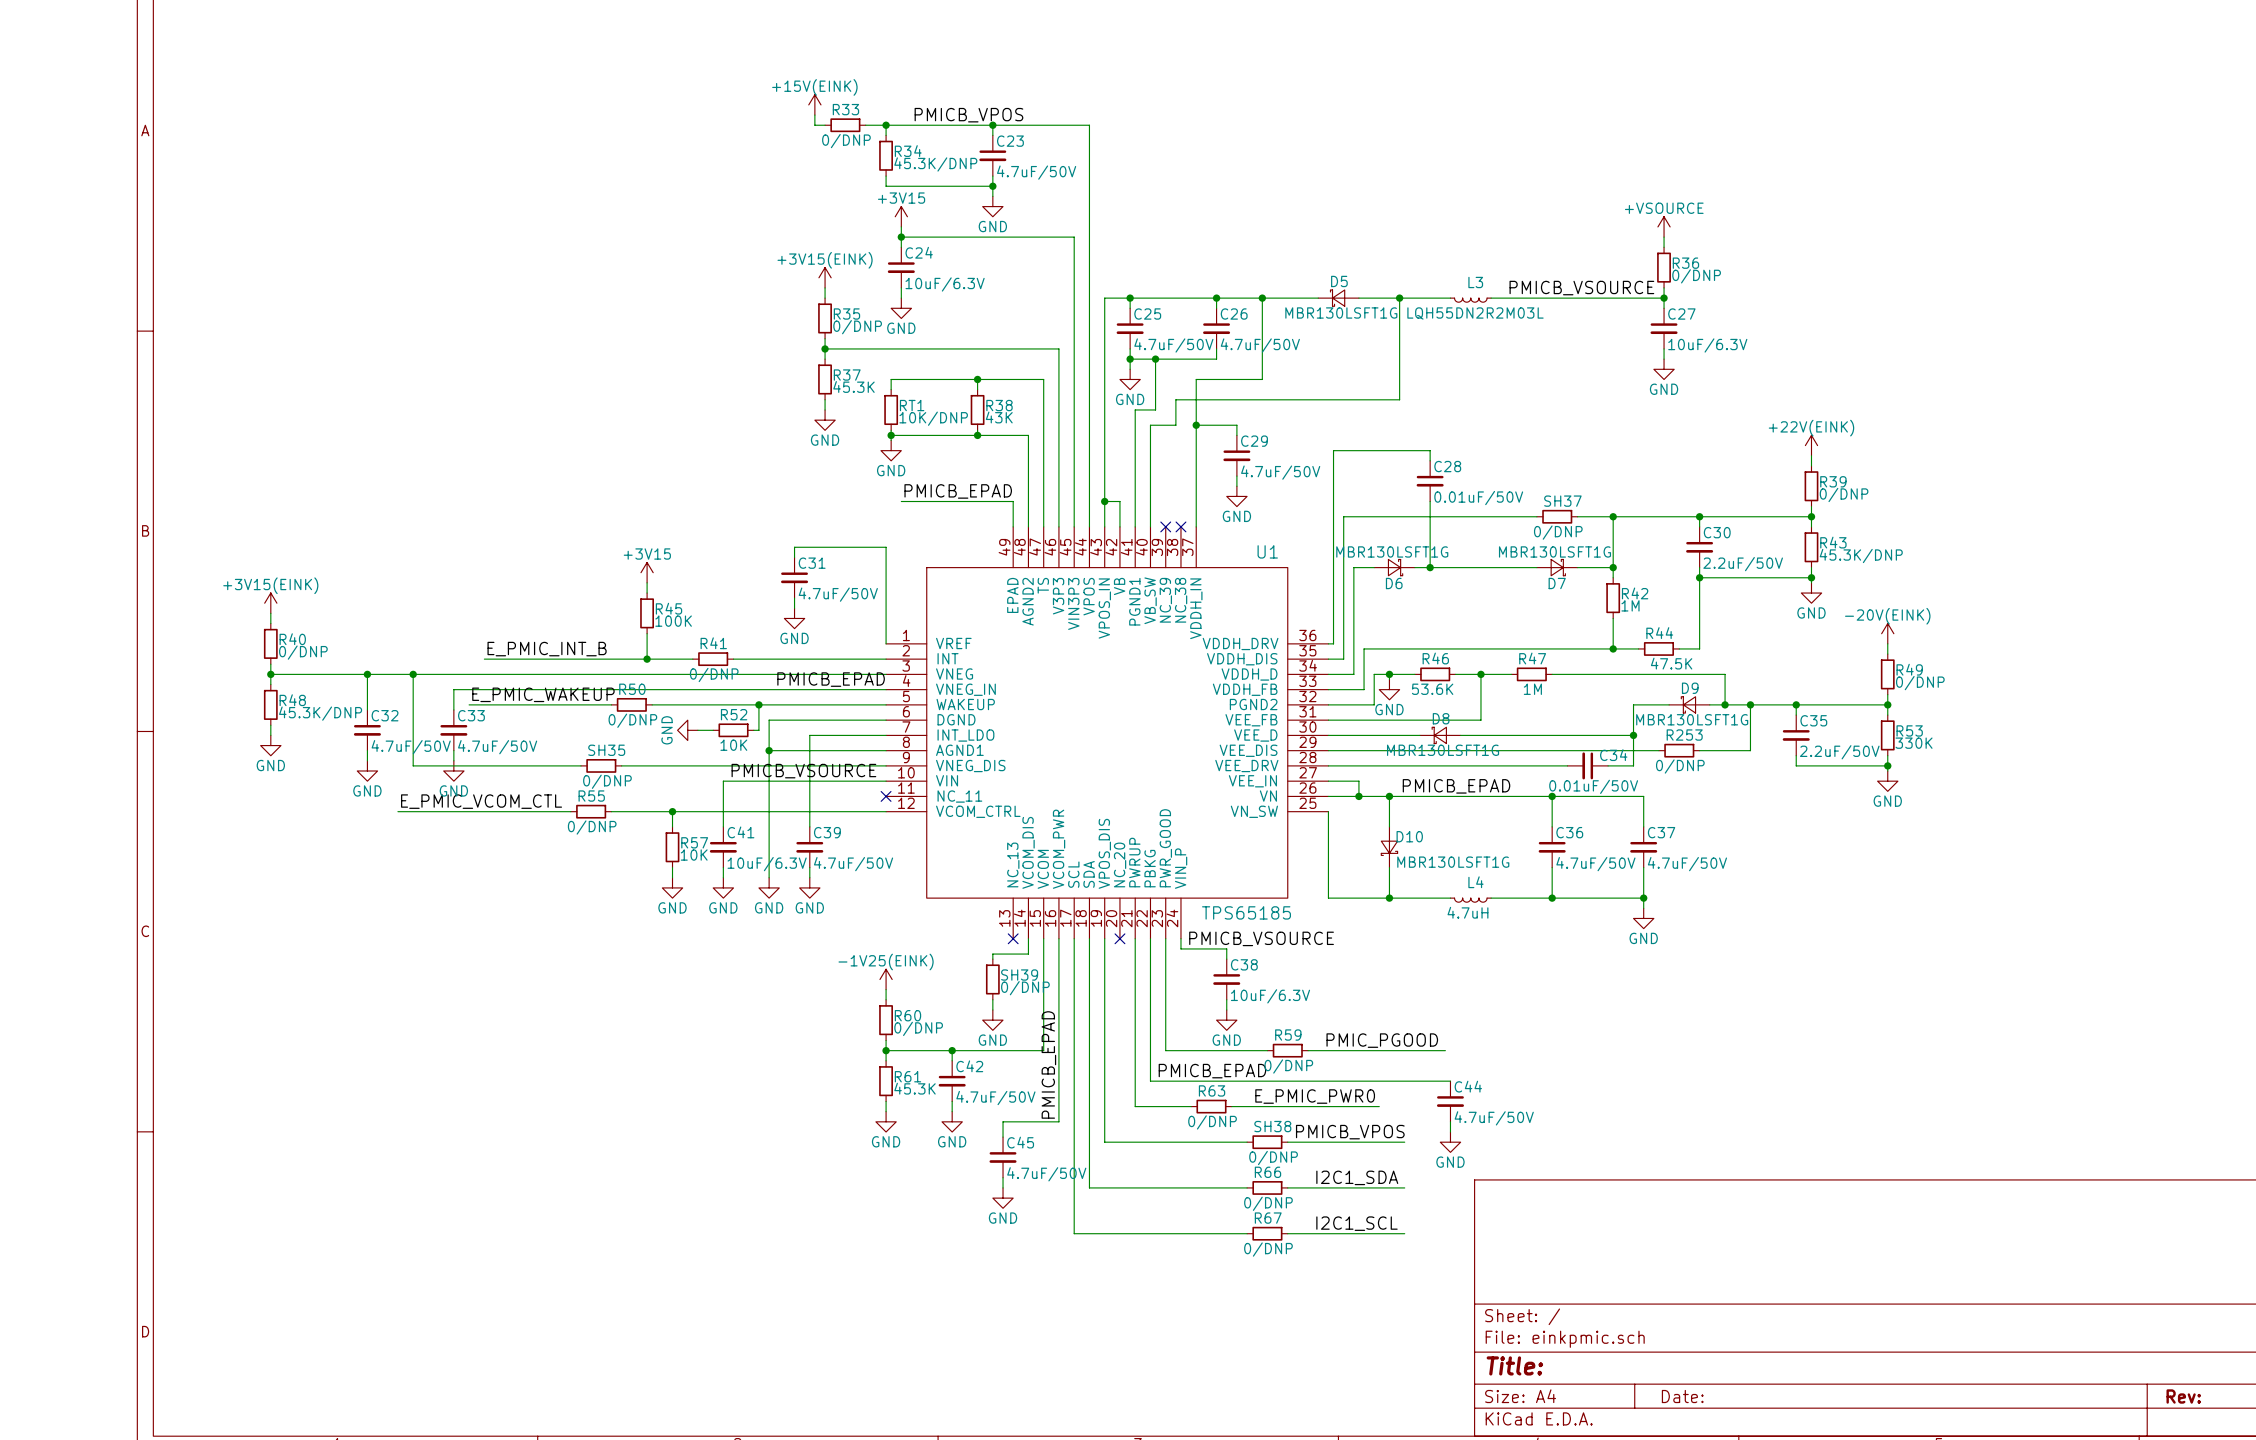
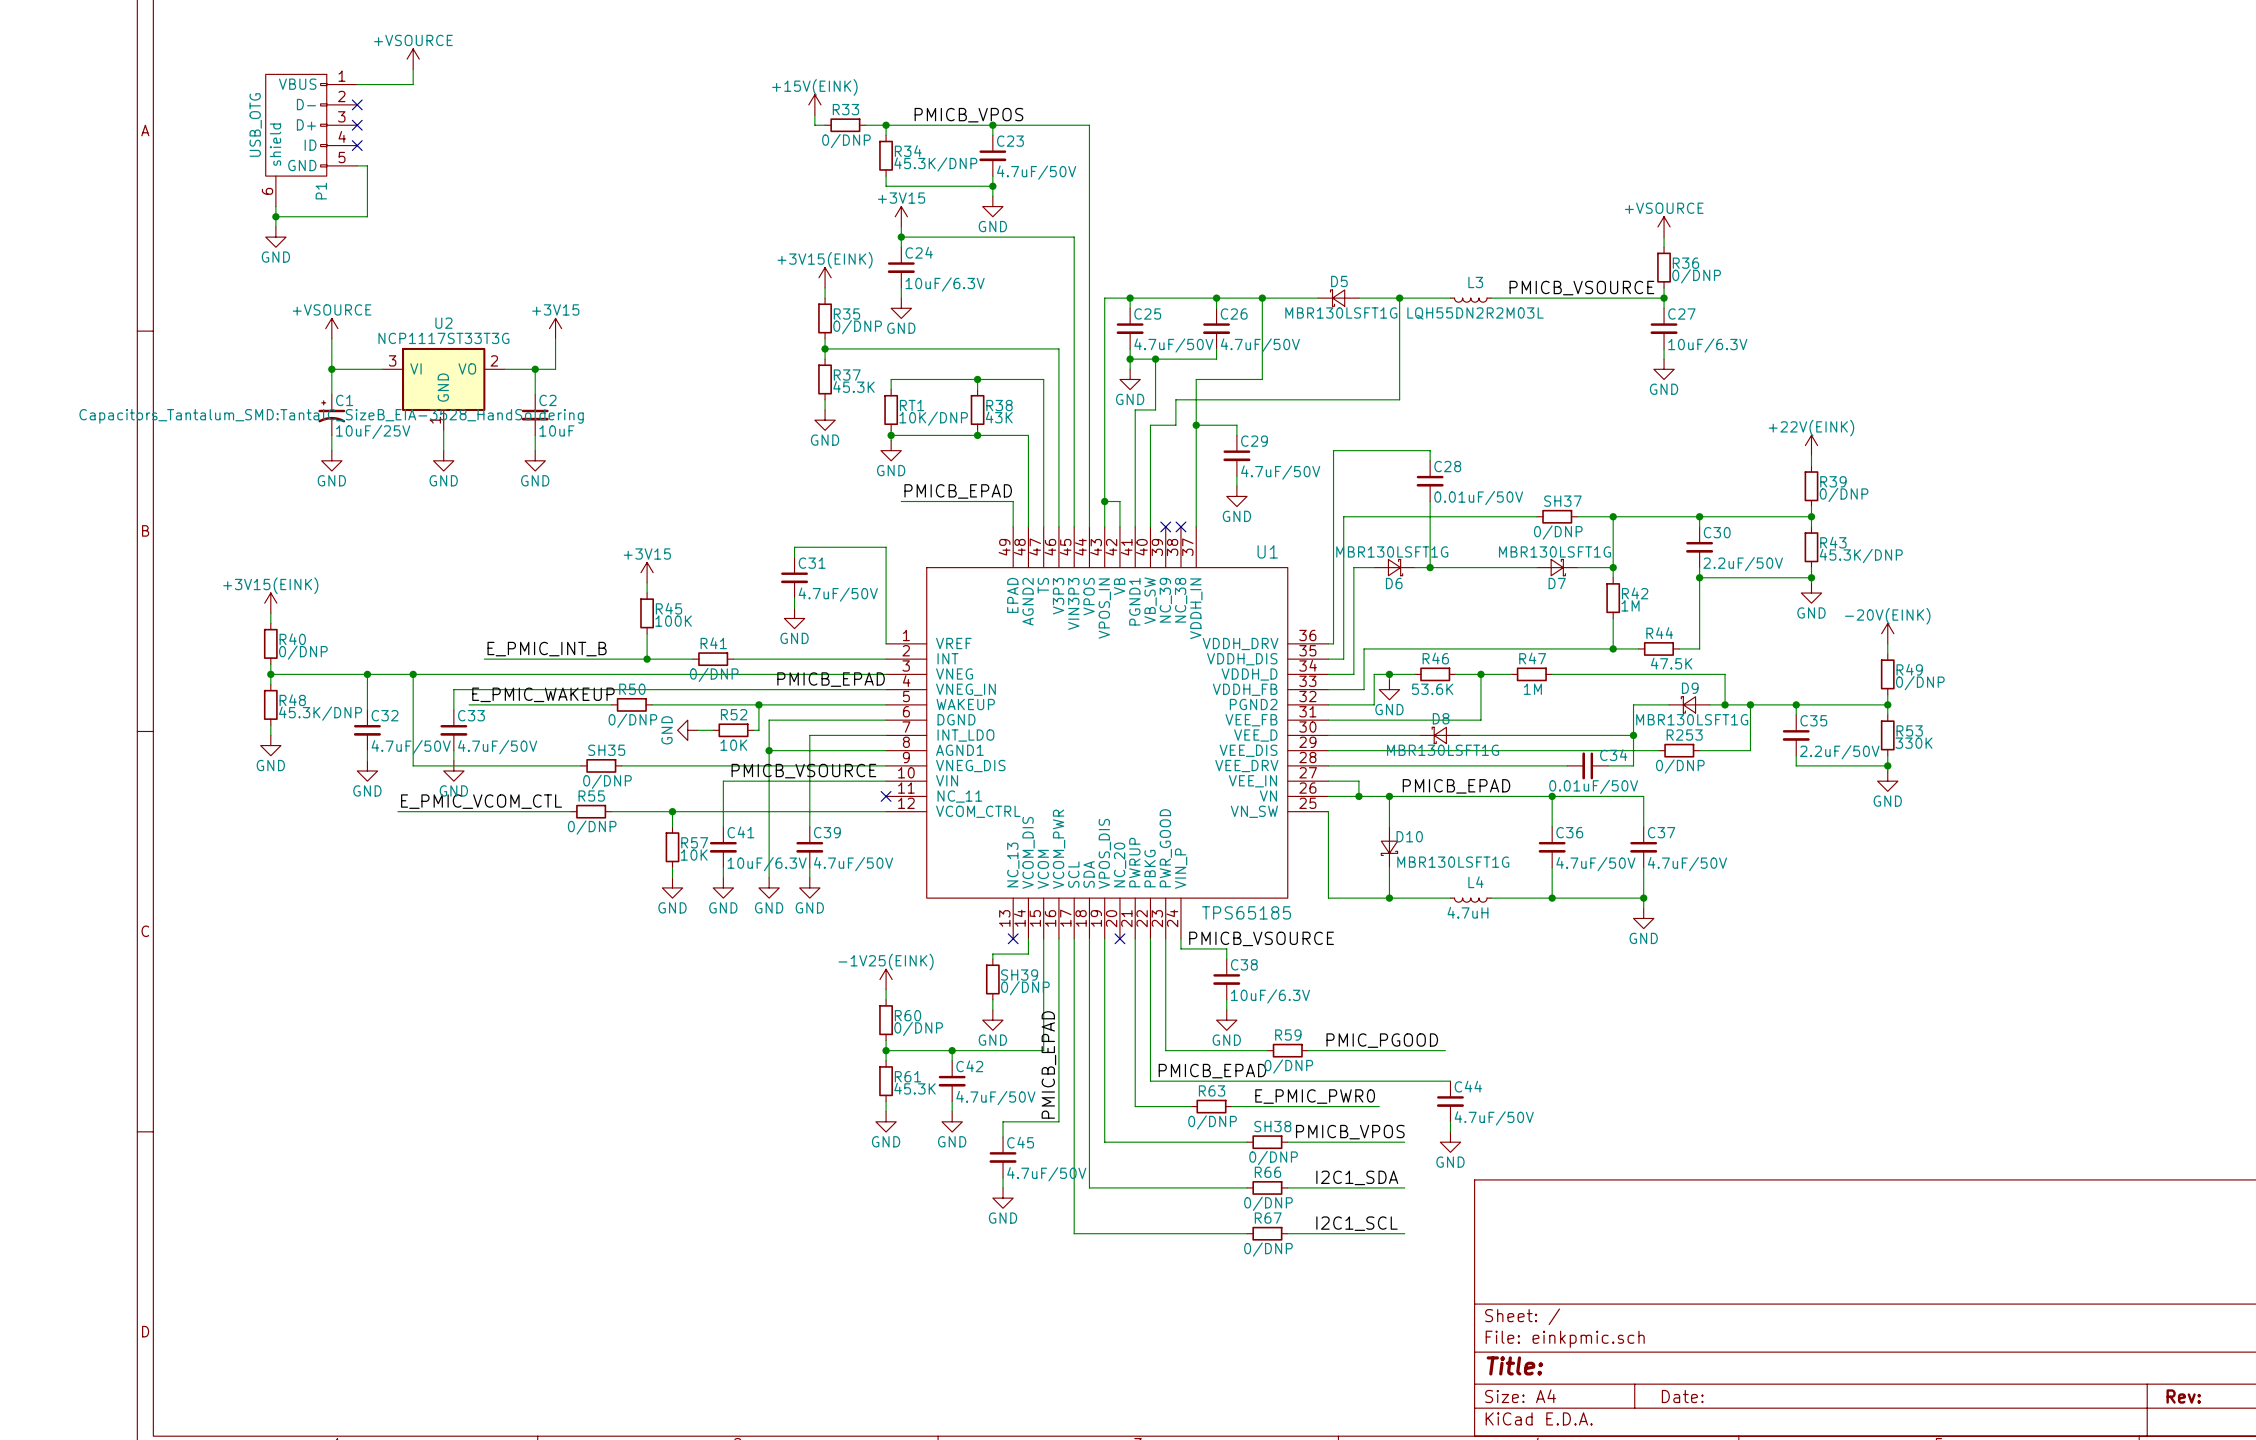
power symbol: none -> +VSOURCE (413, 59)
wire: none -> (413, 69) (413, 84) (357, 84)
no-connect mark: none -> (357, 104)
no-connect mark: none -> (357, 125)
P1: none -> USB_OTG (311, 140)
no-connect mark: none -> (357, 145)
wire: none -> (357, 165) (367, 165) (367, 216) (275, 216)
wire: none -> (275, 206) (275, 226)
junction: none -> (275, 216)
power symbol: none -> GND (275, 237)
power symbol: none -> +VSOURCE (331, 328)
power symbol: none -> +3V15 (555, 328)
wire: none -> (331, 338) (331, 394)
wire: none -> (555, 338) (555, 369) (504, 369)
wire: none -> (331, 369) (382, 369)
junction: none -> (331, 369)
wire: none -> (535, 369) (535, 394)
junction: none -> (535, 369)
U2: none -> NCP1117ST33T3G (443, 389)
C1: none -> 10uF/25V (331, 415)
C2: none -> 10uF (535, 415)
wire: none -> (443, 430) (443, 450)
wire: none -> (331, 435) (331, 450)
wire: none -> (535, 435) (535, 450)
power symbol: none -> GND (331, 460)
power symbol: none -> GND (443, 460)
power symbol: none -> GND (535, 460)

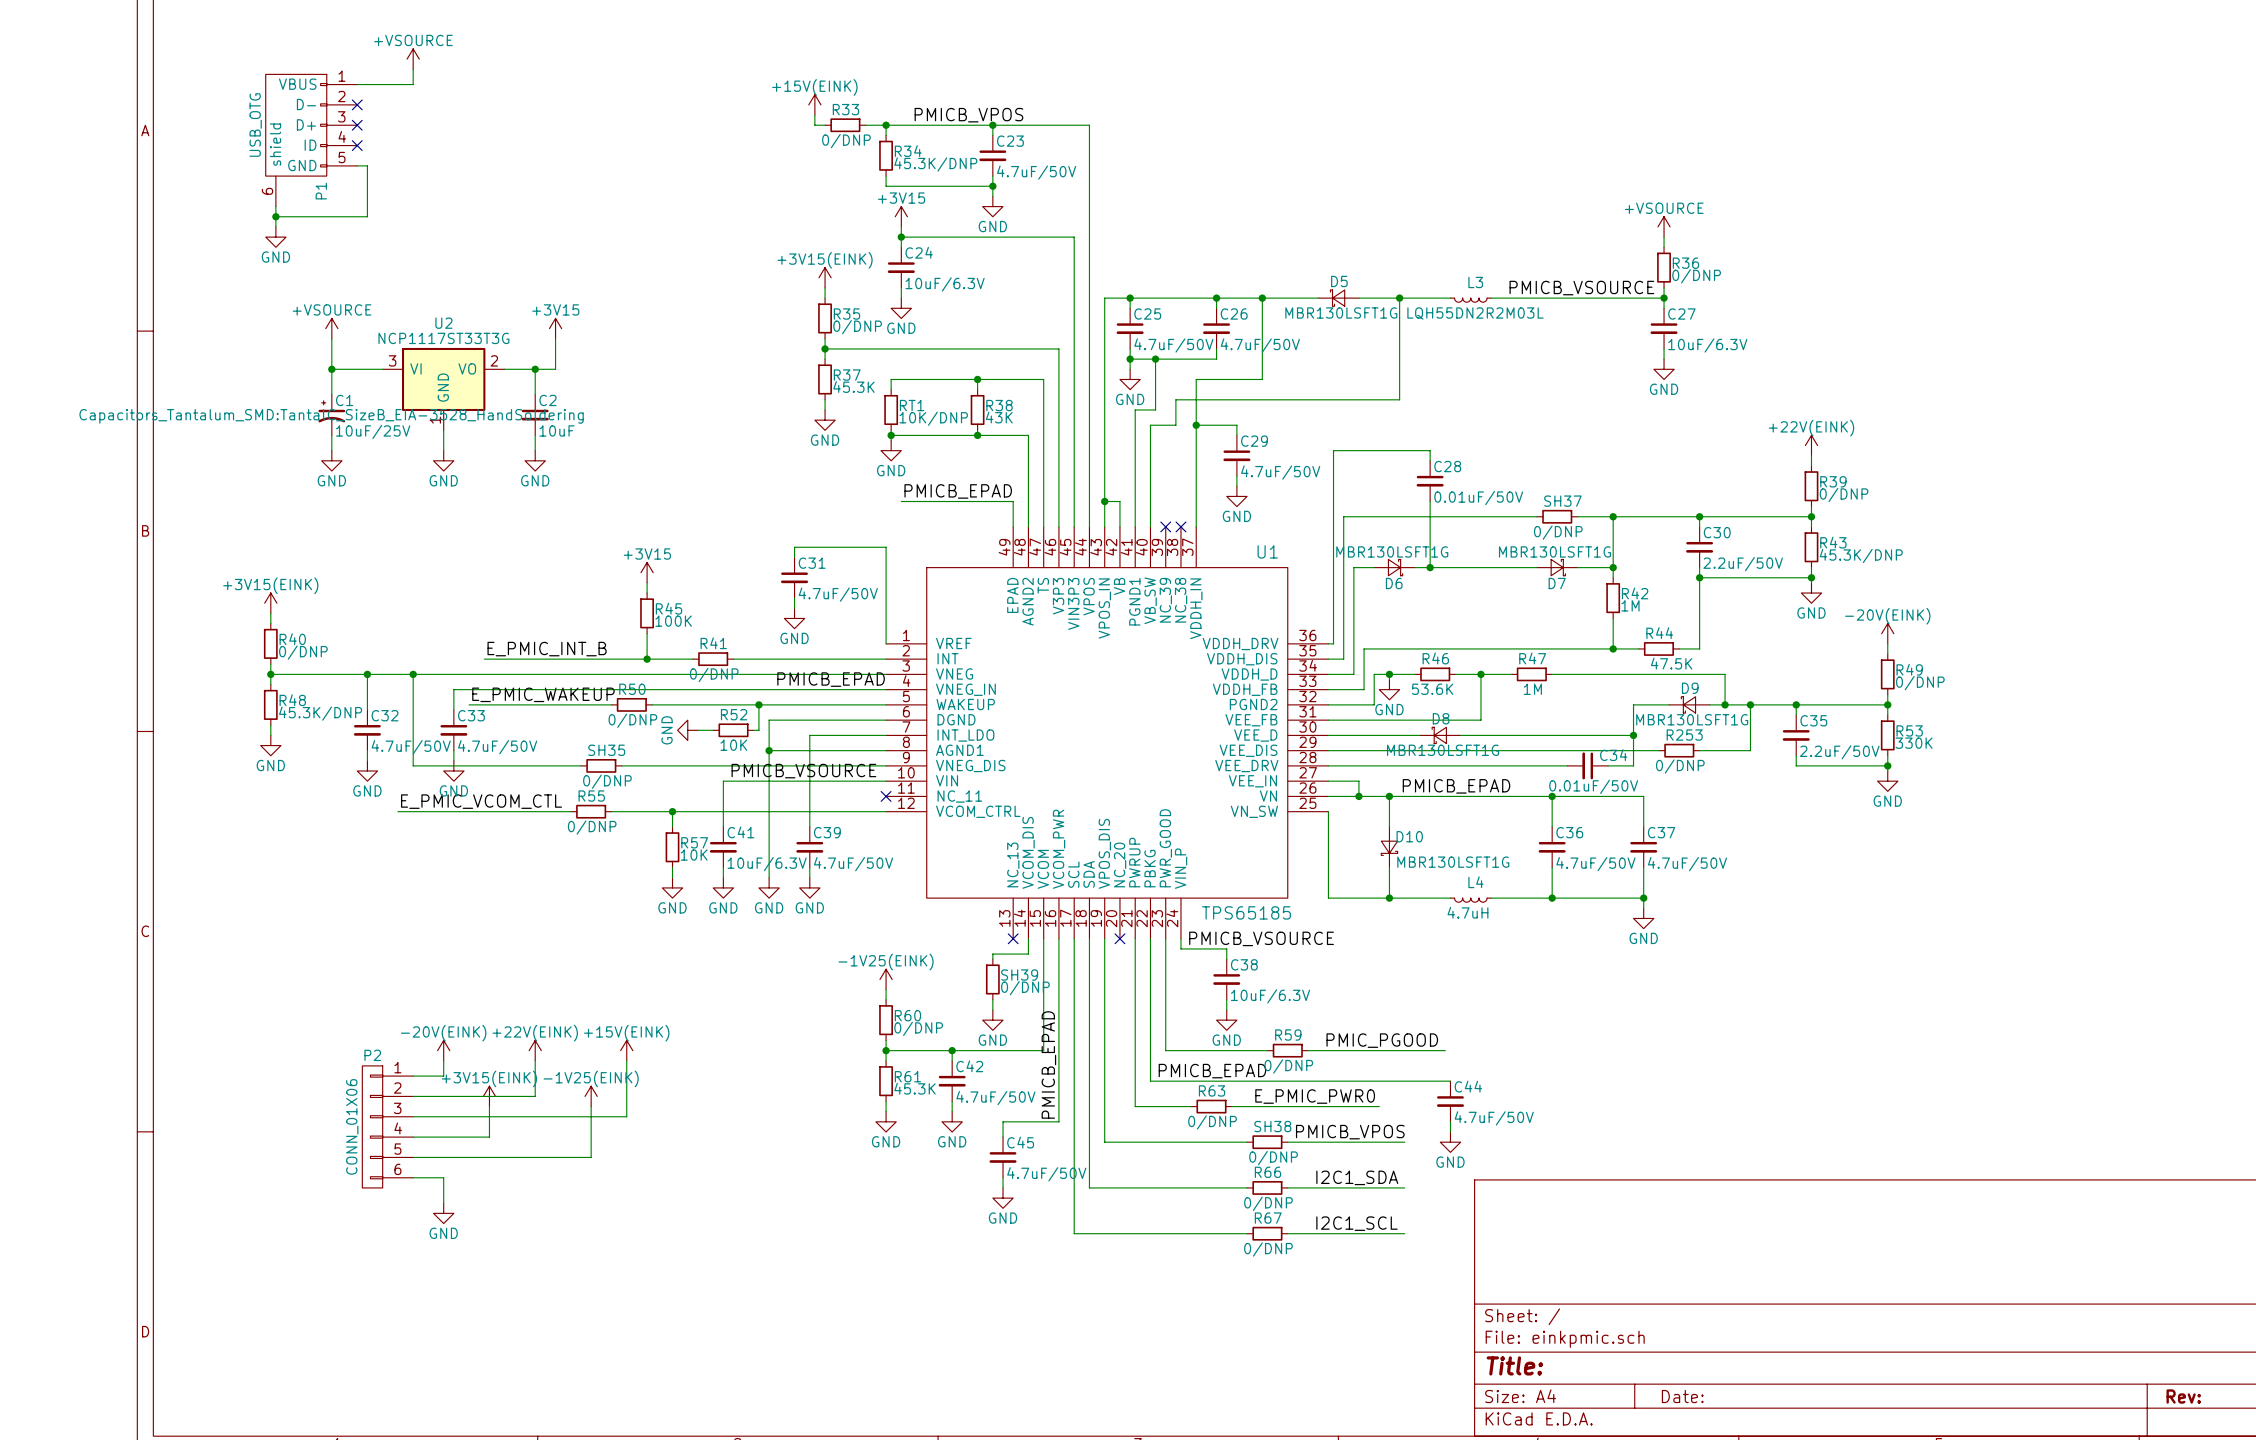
power symbol: none -> -20V(EINK) (443, 1050)
power symbol: none -> +22V(EINK) (535, 1050)
power symbol: none -> +15V(EINK) (626, 1050)
wire: none -> (443, 1060) (443, 1076) (413, 1076)
wire: none -> (535, 1060) (535, 1096) (413, 1096)
wire: none -> (626, 1060) (626, 1116) (413, 1116)
power symbol: none -> +3V15(EINK) (489, 1096)
power symbol: none -> -1V25(EINK) (591, 1096)
wire: none -> (489, 1106) (489, 1137) (413, 1137)
wire: none -> (591, 1106) (591, 1157) (413, 1157)
P2: none -> CONN_01X06 (387, 1126)
wire: none -> (413, 1177) (443, 1177) (443, 1203)
power symbol: none -> GND (443, 1213)

